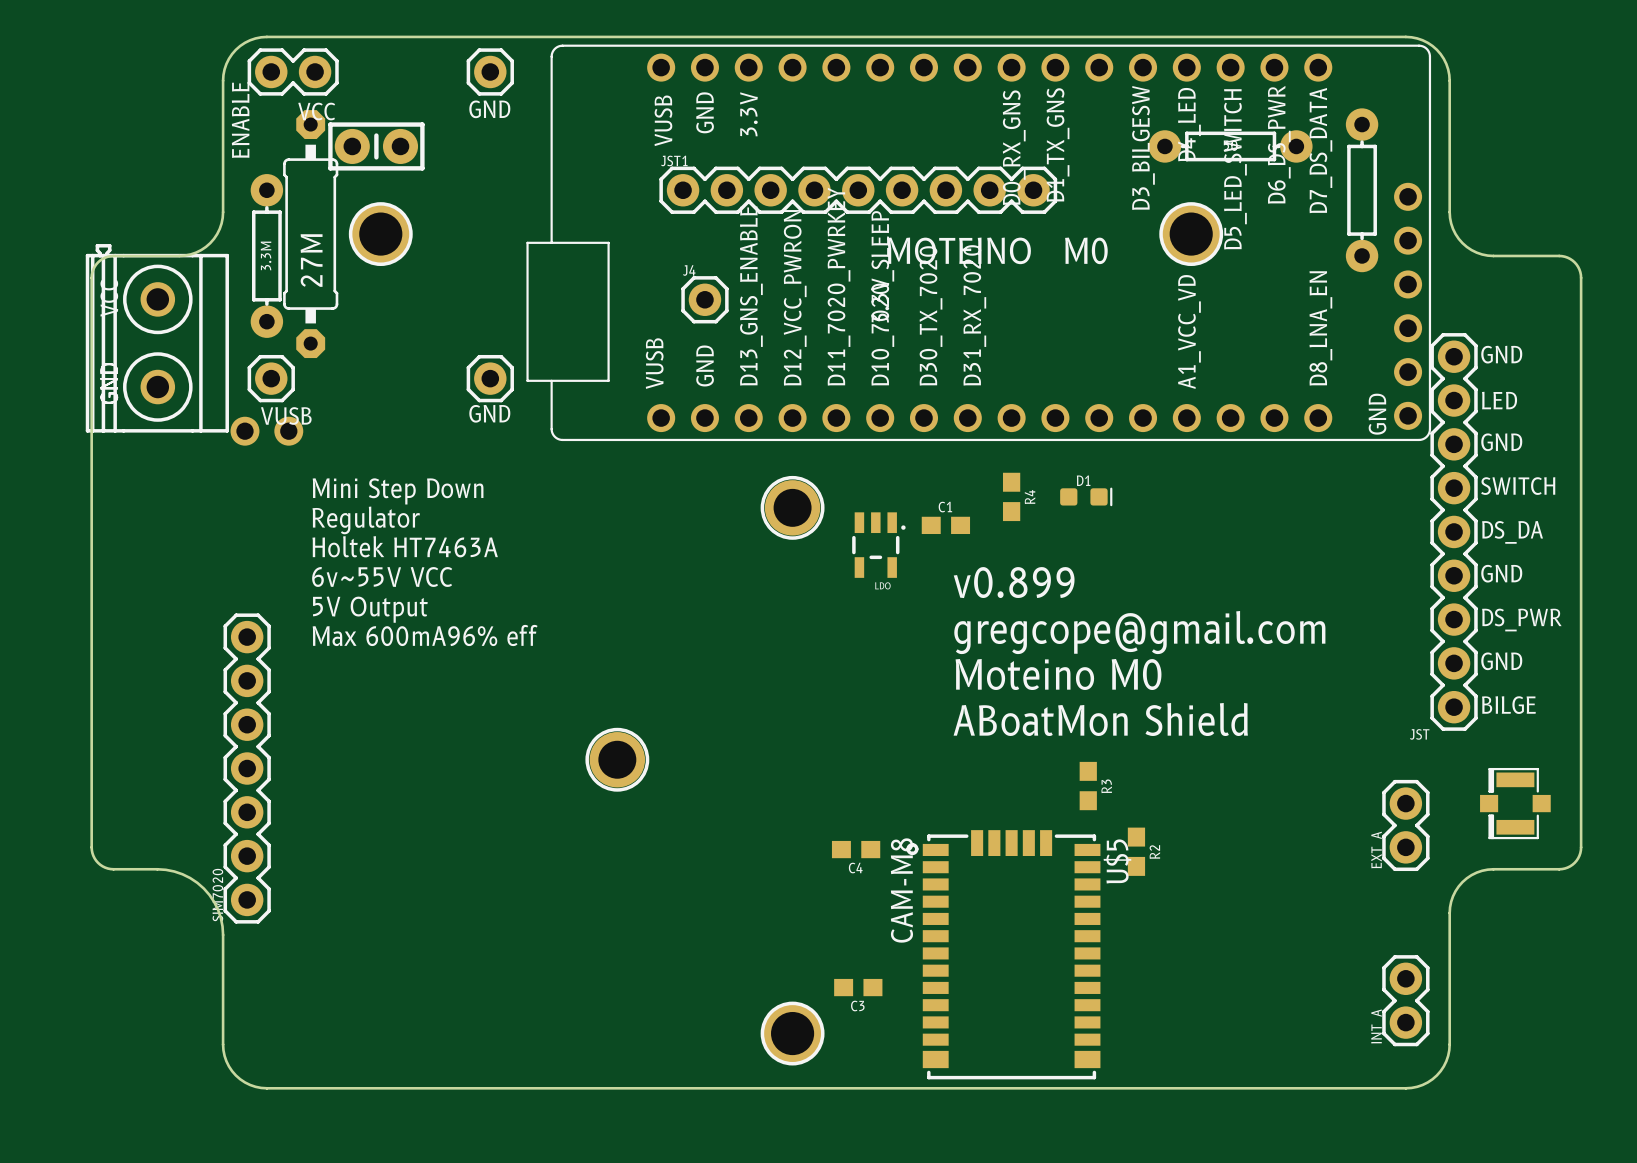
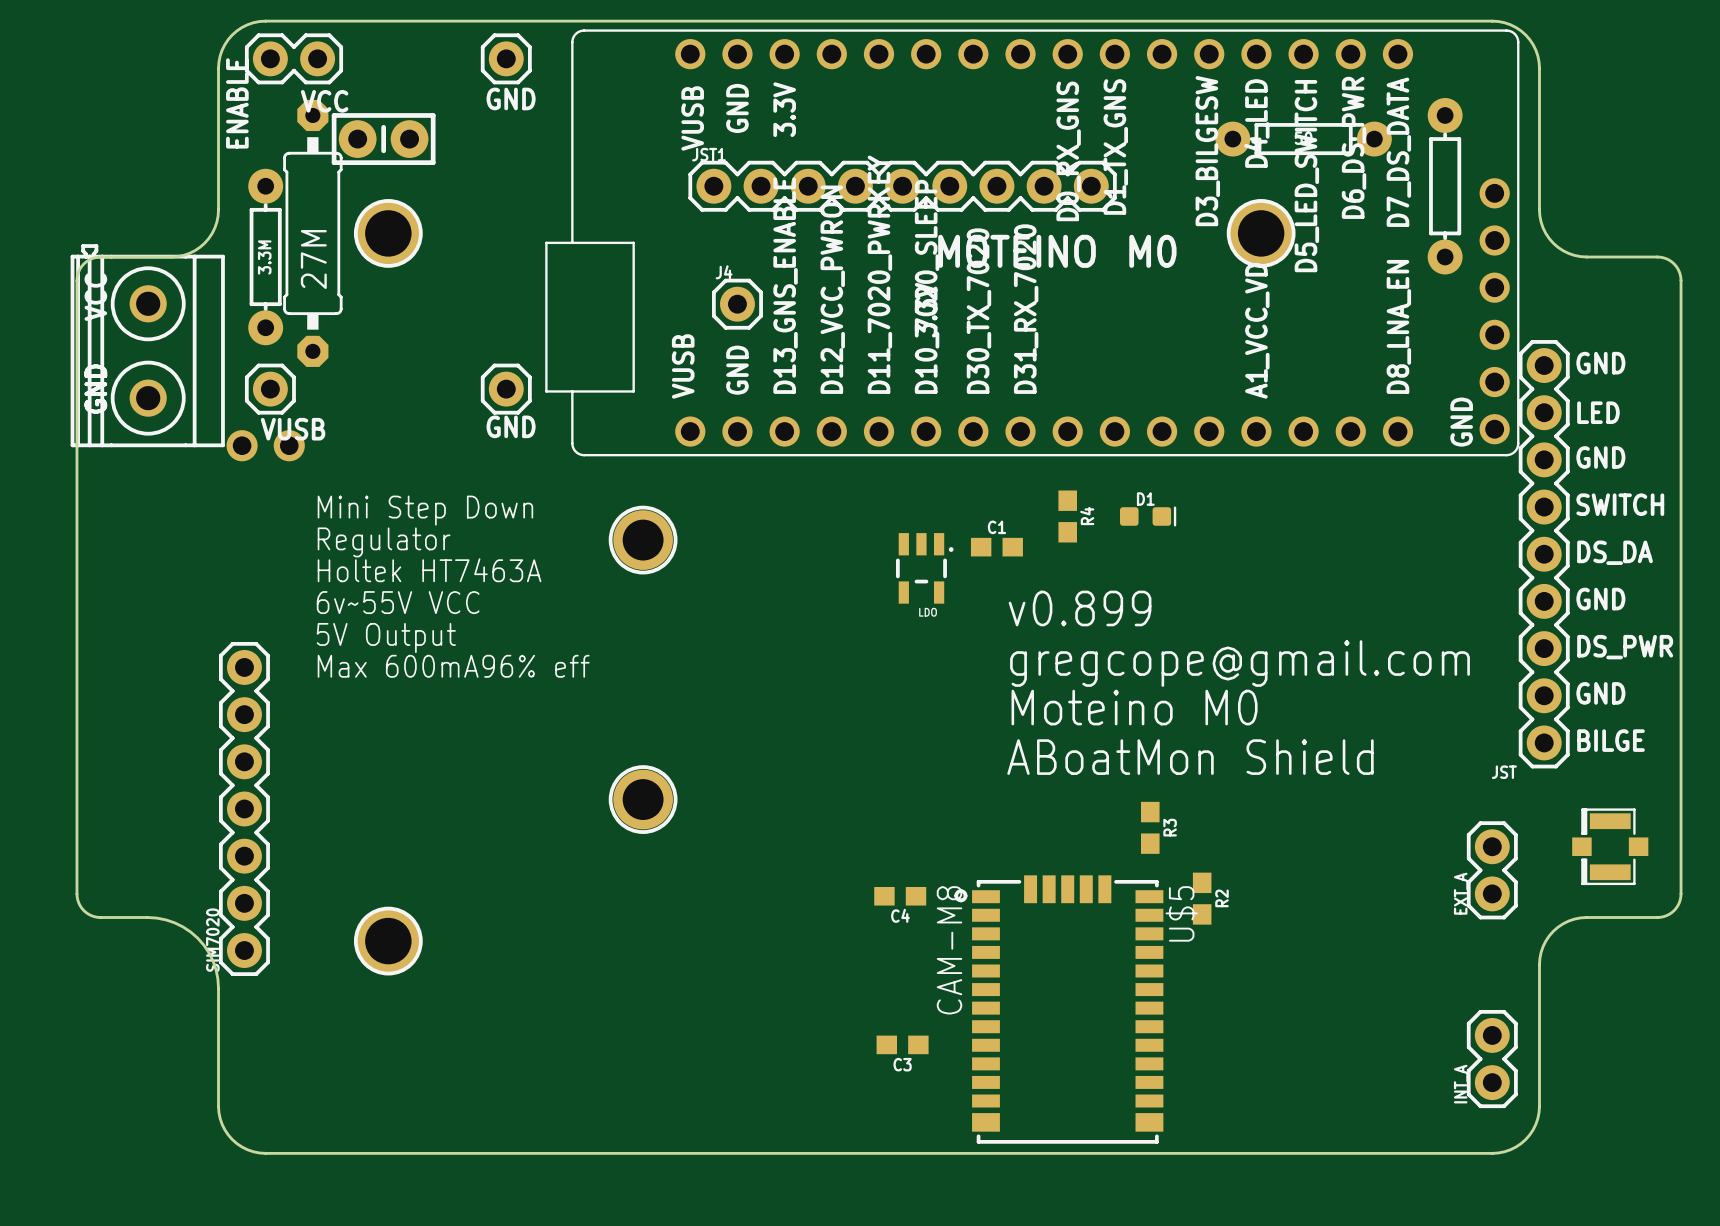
part position: (792, 507) -> (643, 540)
part: none -> (388, 941)
part: (792, 1033) -> none

